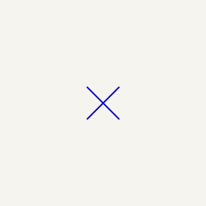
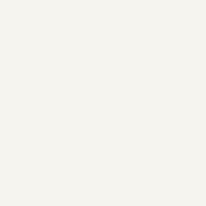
no-connect mark: (103, 103) -> none

